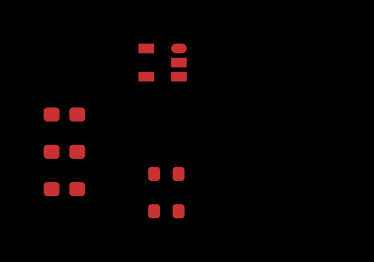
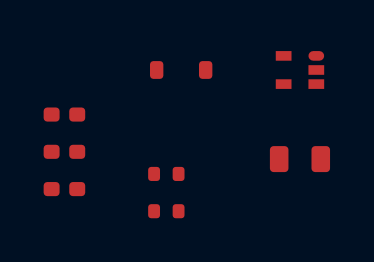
part position: (162, 62) -> (299, 69)
part: none -> (181, 69)
part: none -> (299, 159)

